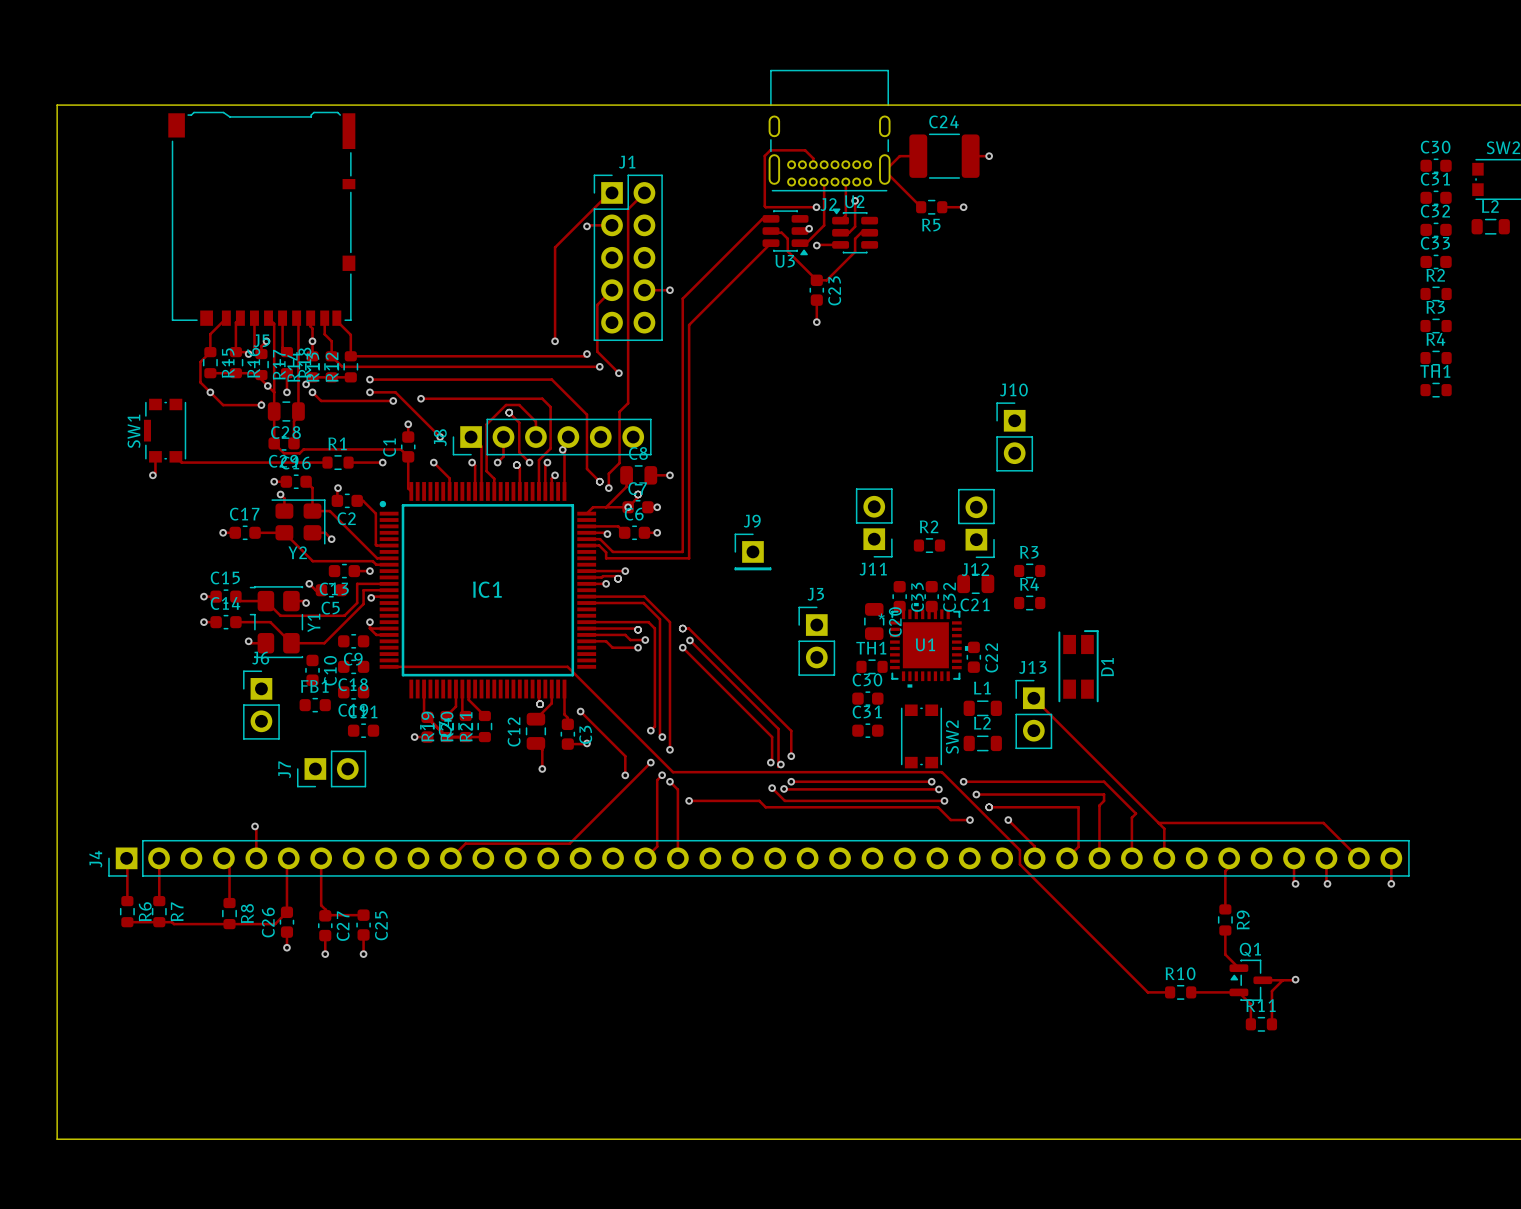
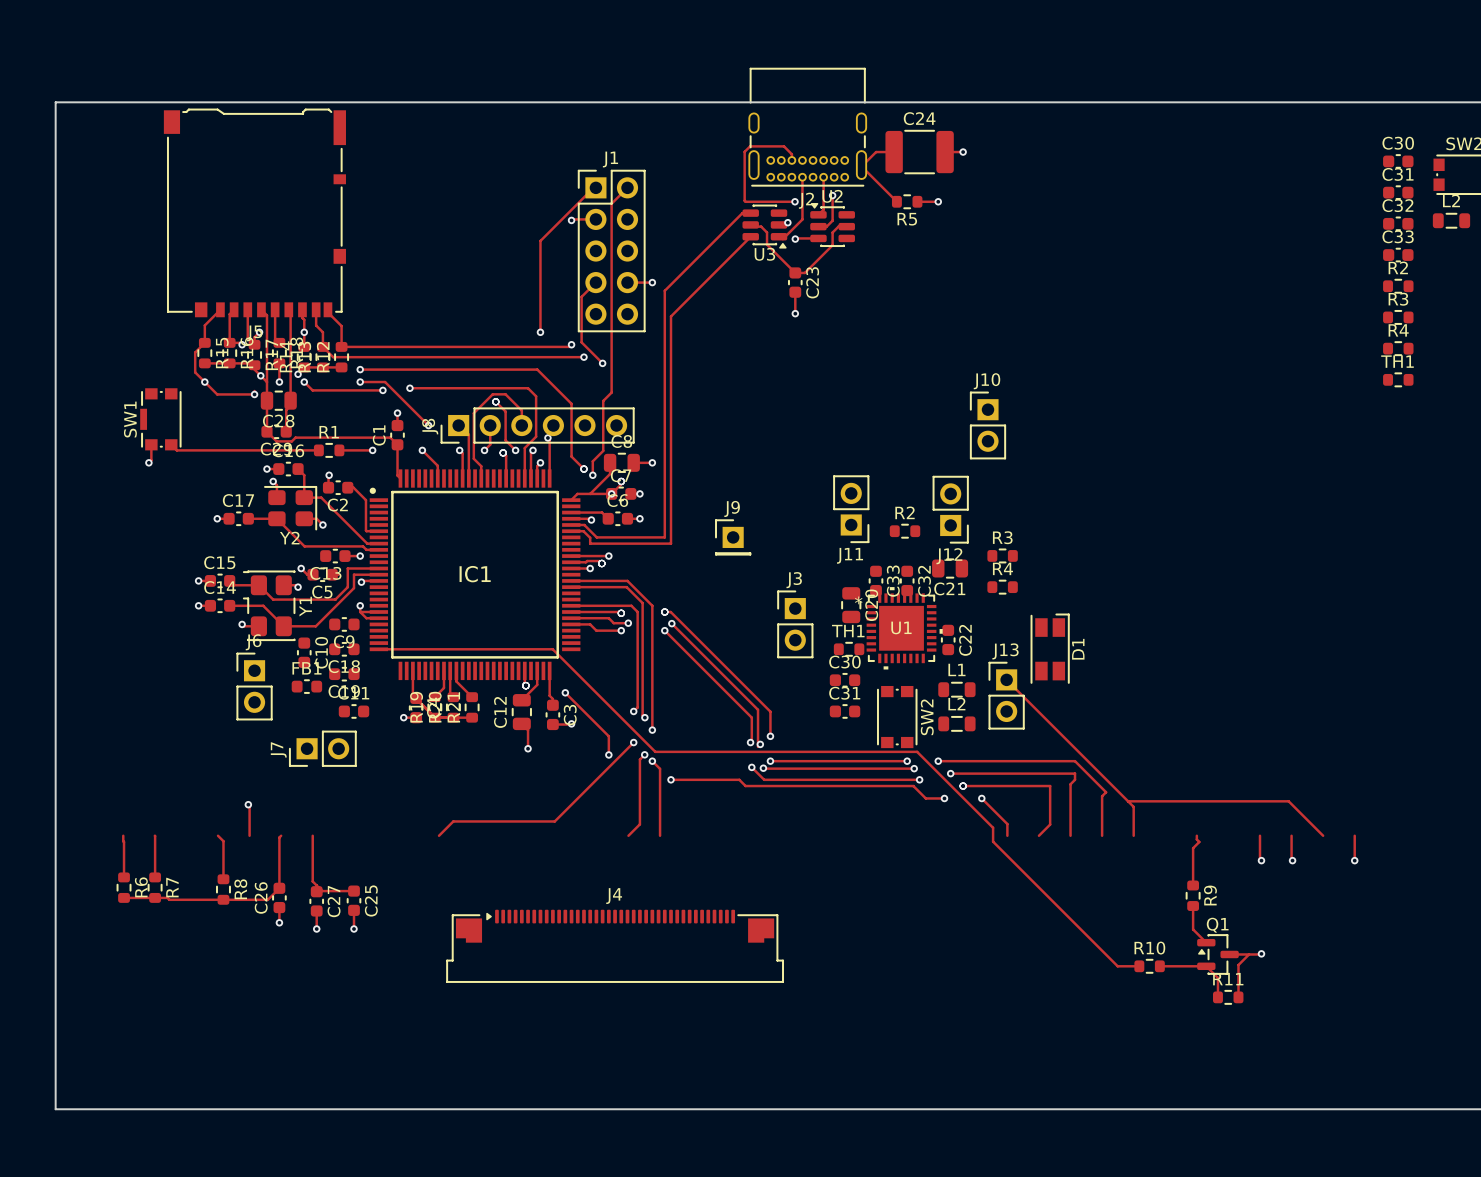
J4 footprint: [108, 839, 1410, 877] -> [446, 909, 784, 983]
J4 name position: J4 (95, 859) -> J4 (614, 896)

